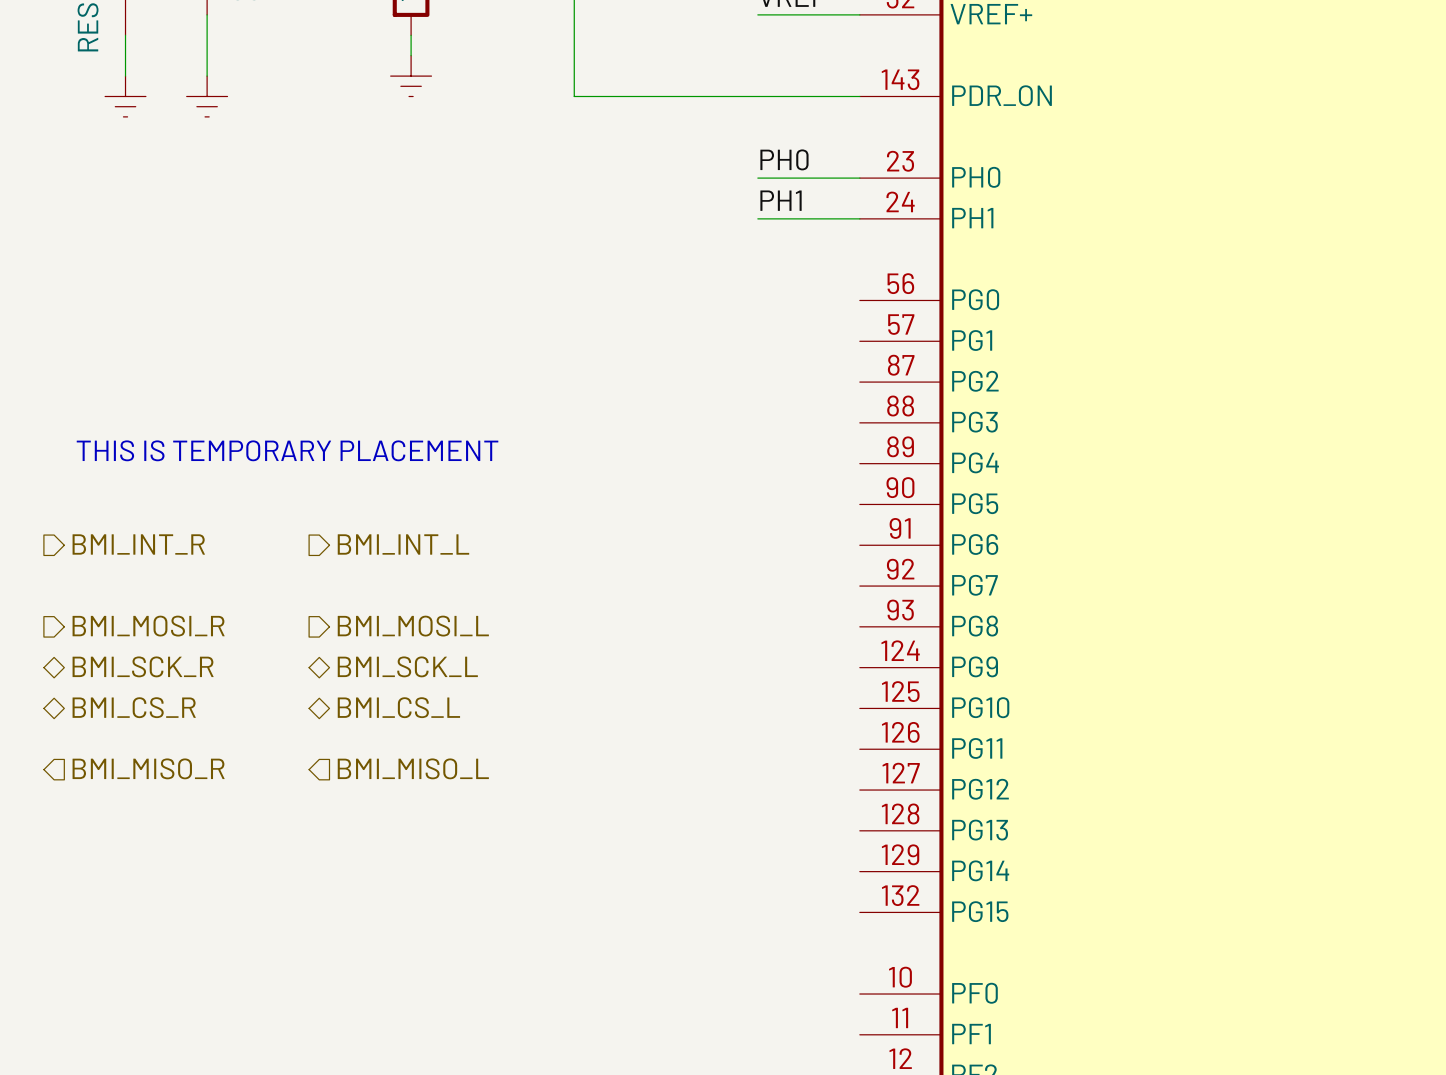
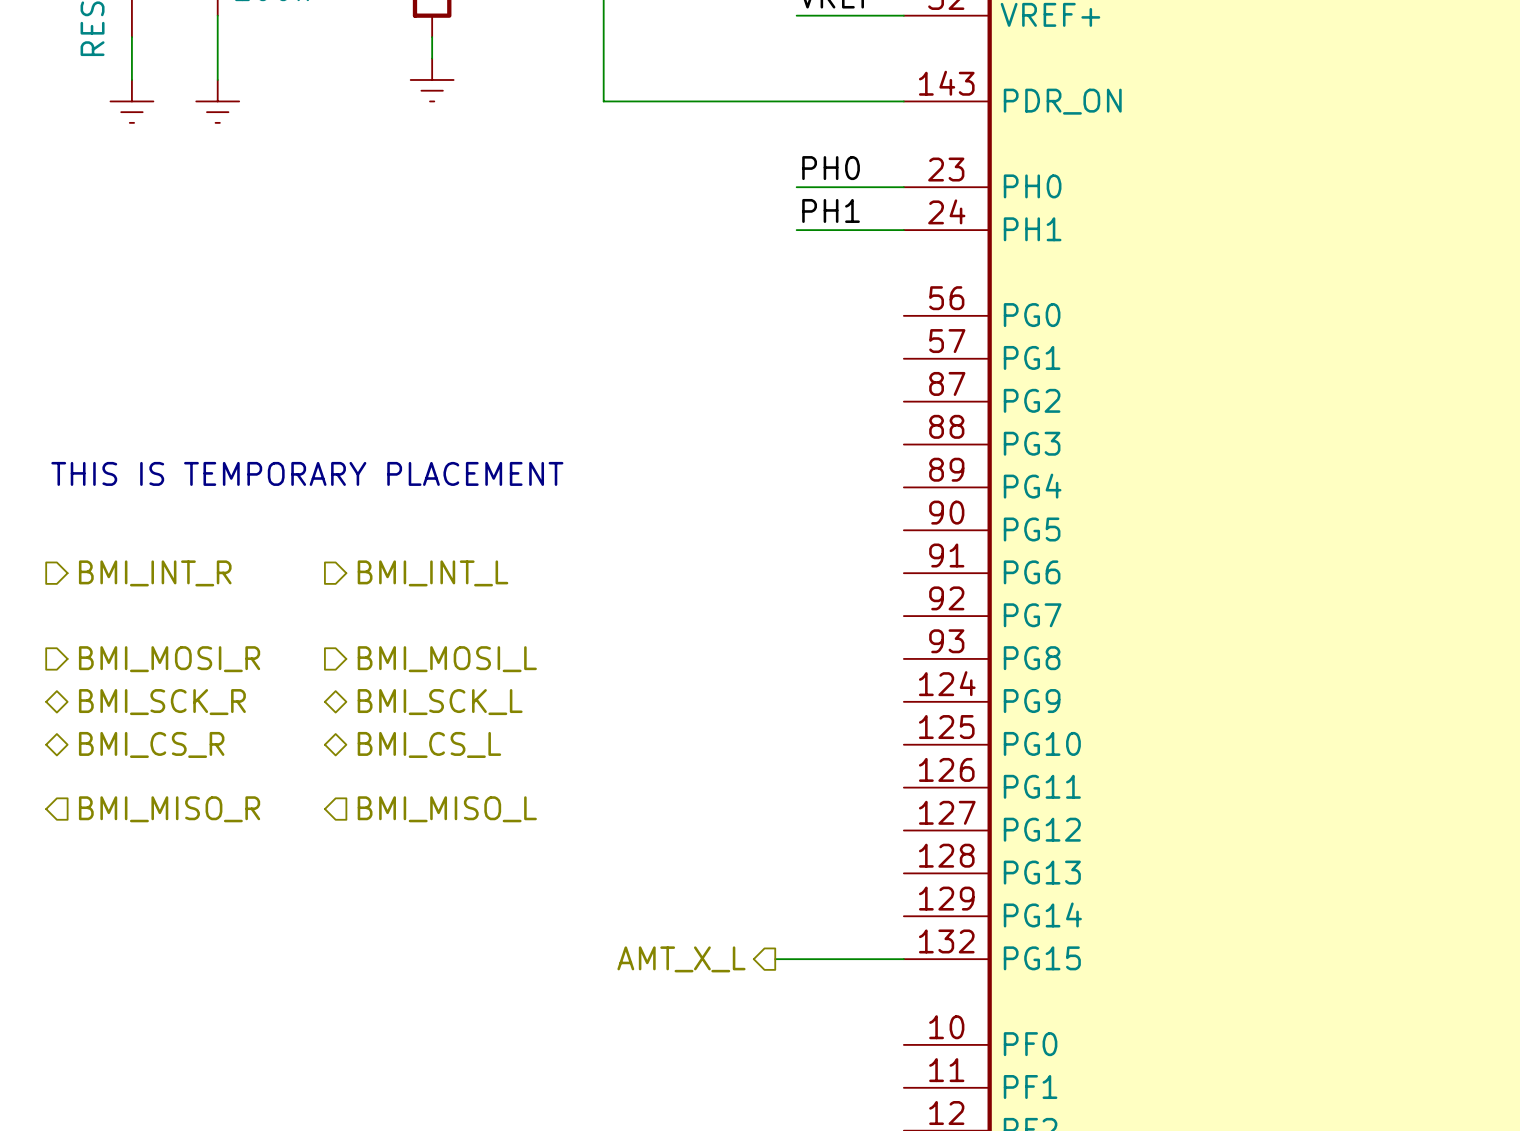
hierarchical label: none -> AMT_X_L (681, 959)
wire: none -> (775, 959) (903, 959)

